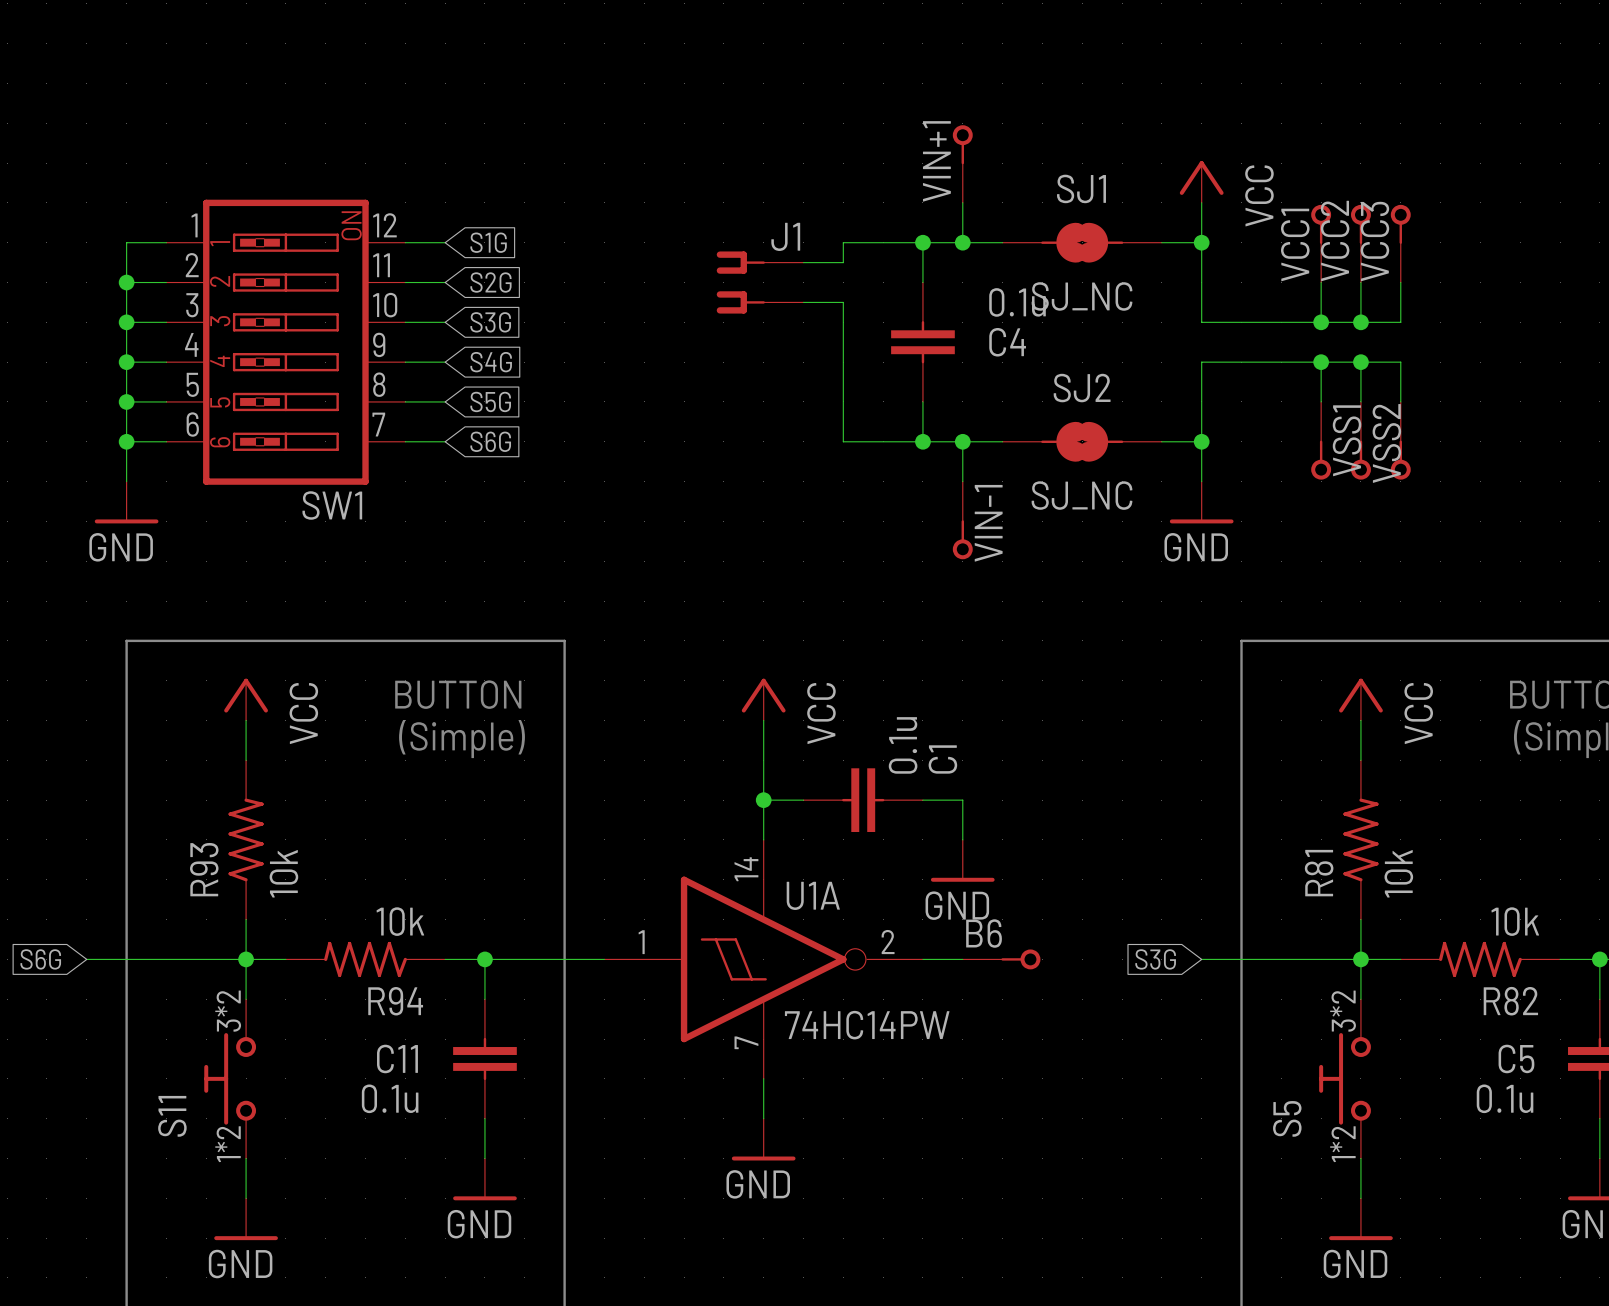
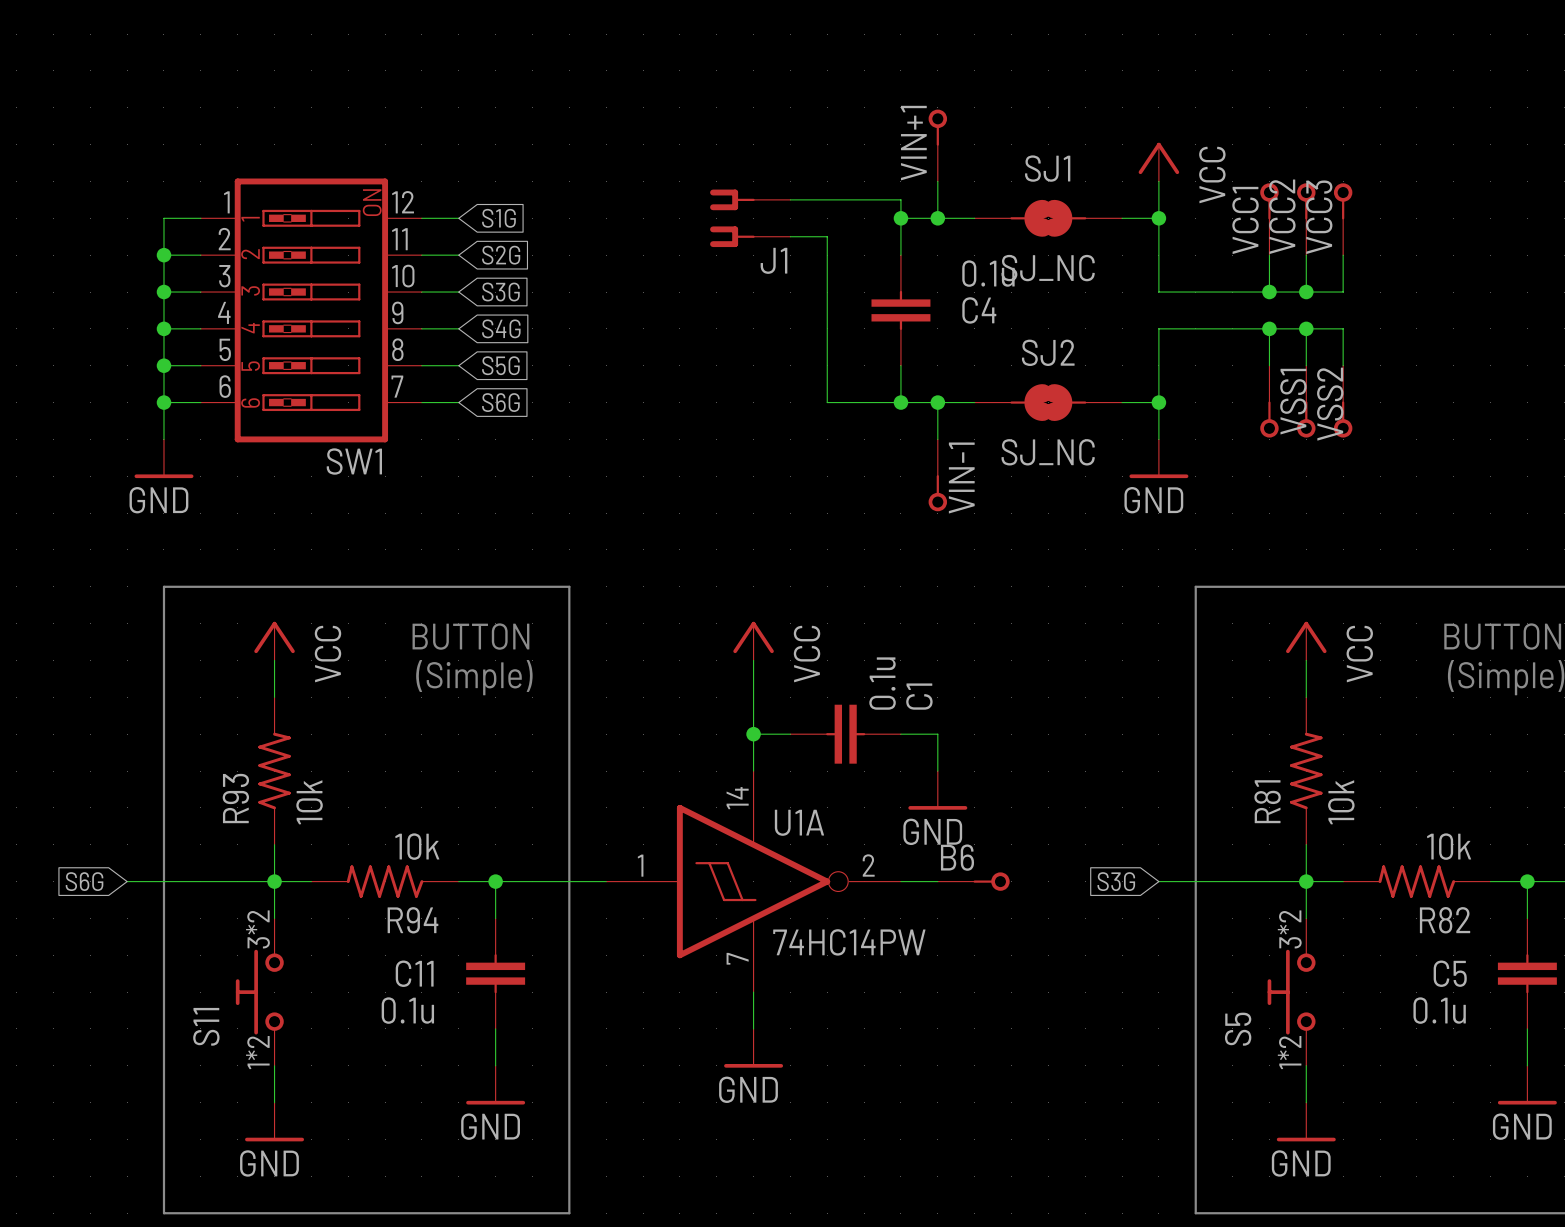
J1 name position: J1 (785, 236) -> J1 (773, 260)
wire: (922, 242) (843, 242) (843, 262) -> (900, 218) (900, 199) (790, 199)
J1 position: (760, 282) -> (750, 218)
wire: (803, 302) (843, 302) -> (827, 236) (827, 273)

